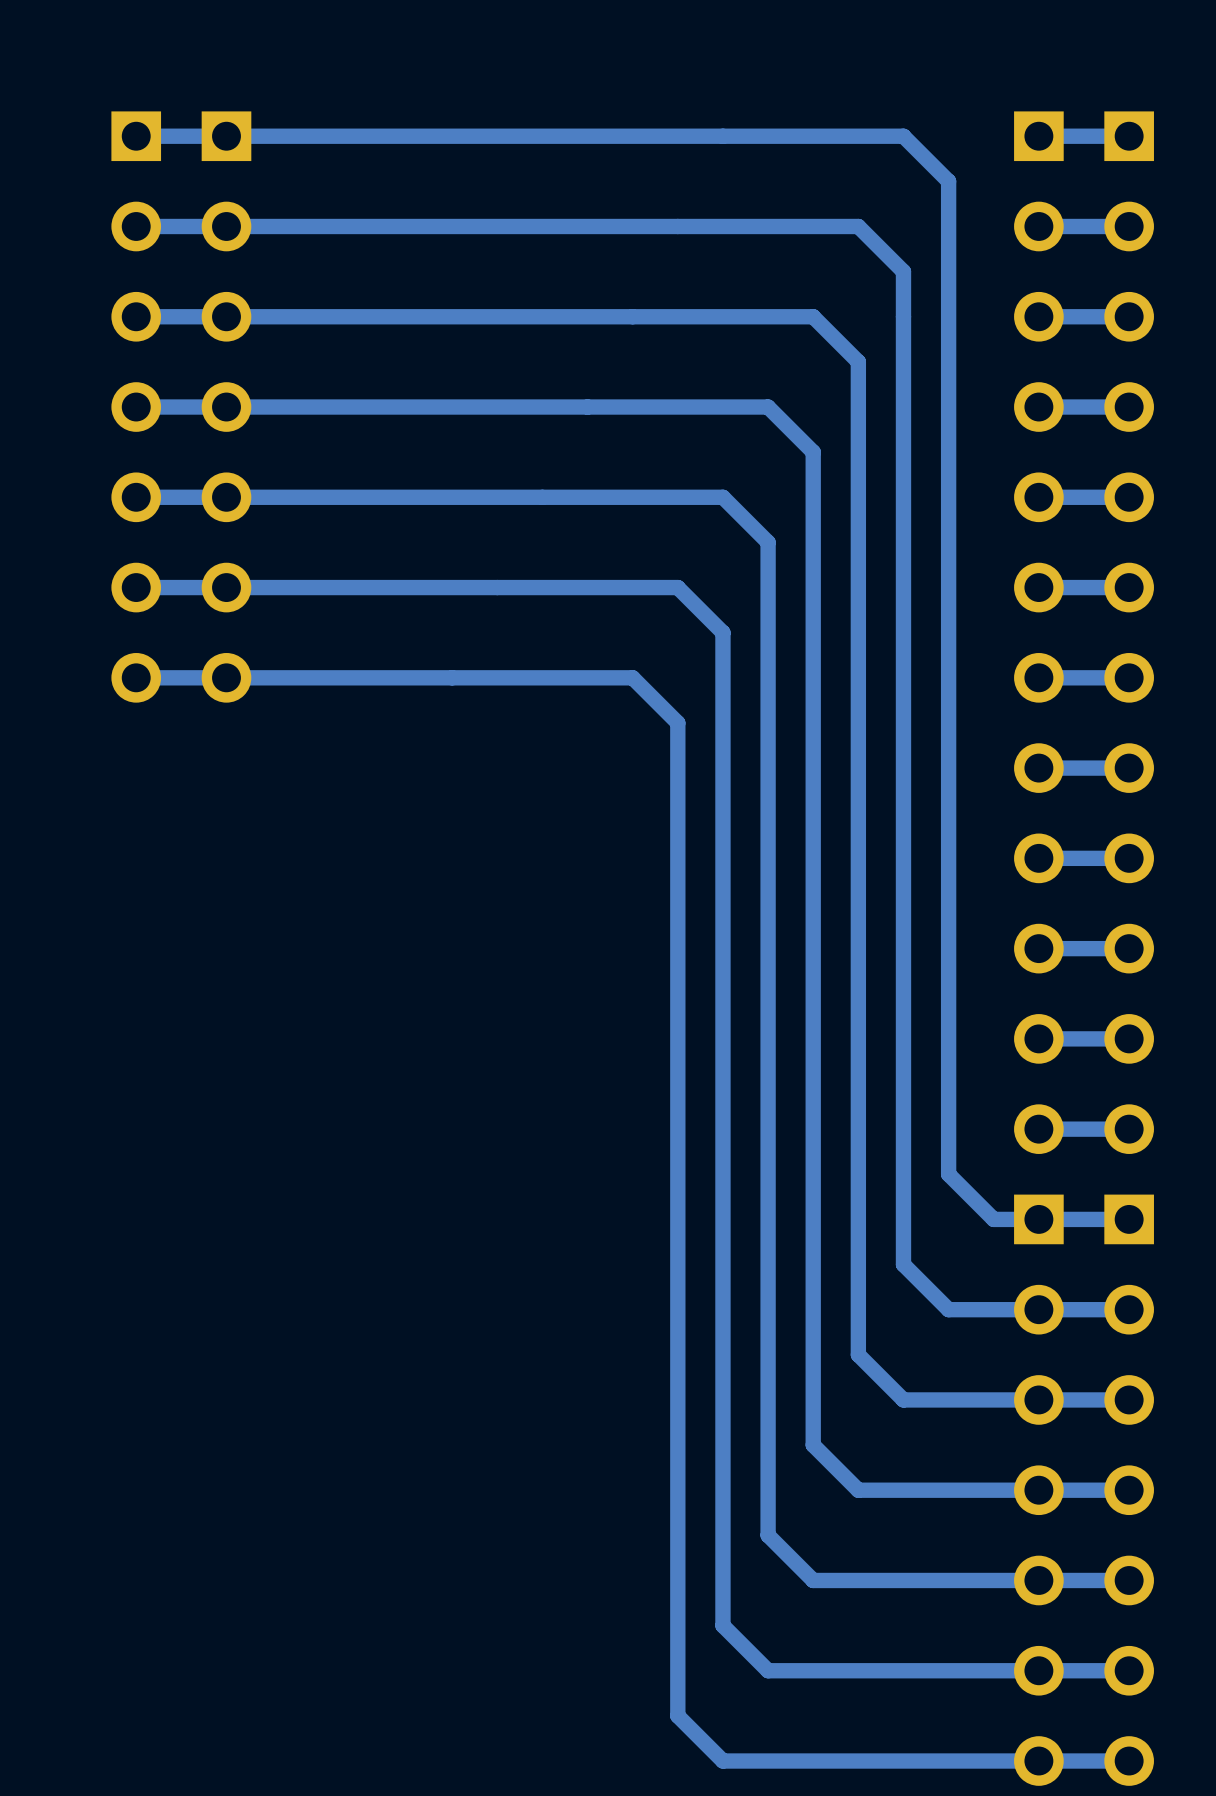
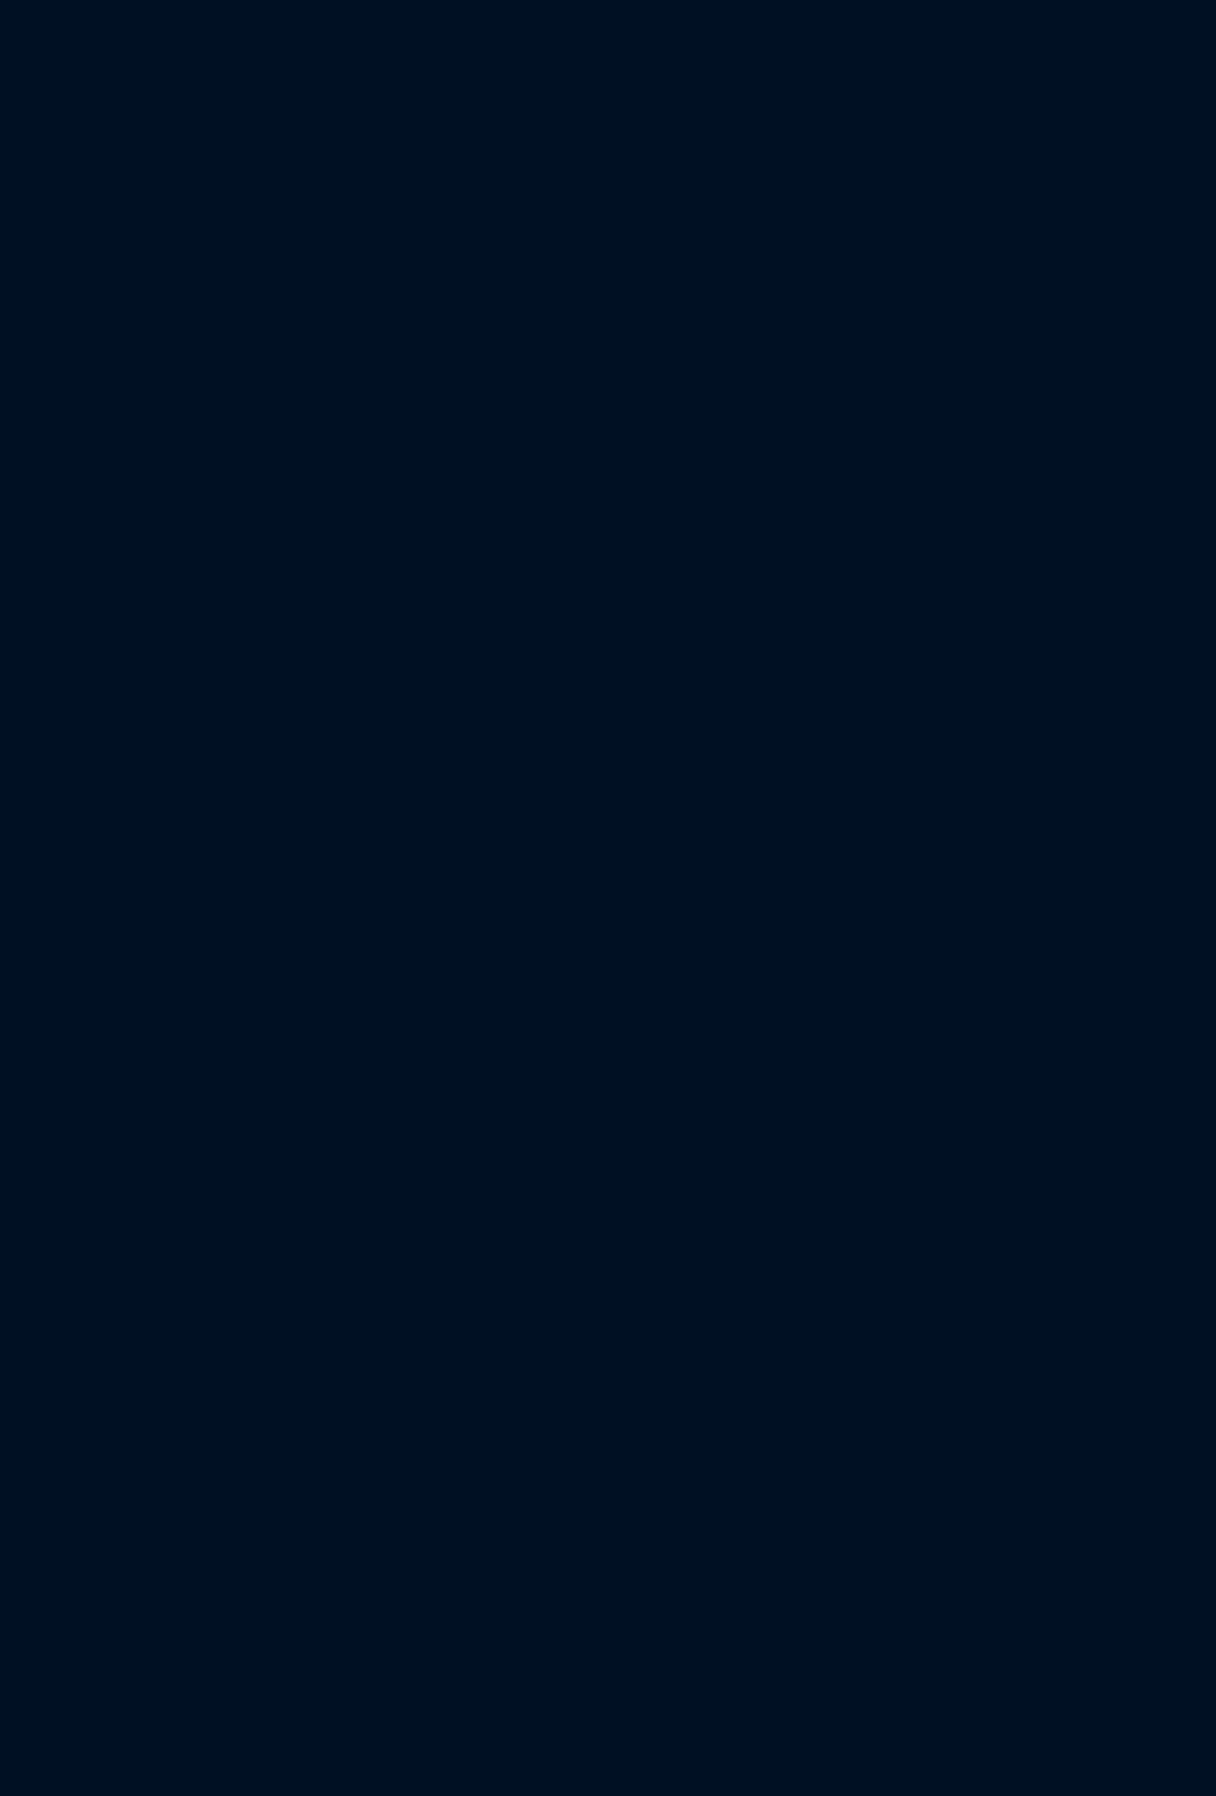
bottom track: (136, 136) (903, 136) (948, 181) (948, 1174) (993, 1219) (1129, 1219) -> none
bottom track: (1129, 136) (1038, 136) -> none
bottom track: (136, 226) (858, 226) (903, 271) (903, 1264) (948, 1309) (1129, 1309) -> none
bottom track: (1129, 226) (1038, 226) -> none
bottom track: (136, 316) (813, 316) (858, 361) (858, 1354) (903, 1399) (1129, 1399) -> none
bottom track: (1129, 316) (1038, 316) -> none
bottom track: (136, 407) (768, 407) (813, 452) (813, 1445) (858, 1490) (1129, 1490) -> none
part: (136, 407) -> none
part: (226, 407) -> none
bottom track: (1129, 407) (1038, 407) -> none
bottom track: (136, 497) (722, 497) (768, 542) (768, 1535) (813, 1580) (1129, 1580) -> none
bottom track: (1129, 497) (1038, 497) -> none
bottom track: (136, 587) (677, 587) (722, 632) (722, 1625) (768, 1670) (1129, 1670) -> none
bottom track: (1129, 587) (1038, 587) -> none
part: (1038, 632) -> none
part: (1129, 632) -> none
bottom track: (136, 677) (632, 677) (677, 722) (677, 1715) (722, 1761) (1129, 1761) -> none
bottom track: (1129, 677) (1038, 677) -> none
bottom track: (1129, 768) (1038, 768) -> none
bottom track: (1129, 858) (1038, 858) -> none
bottom track: (1129, 948) (1038, 948) -> none
bottom track: (1129, 1038) (1038, 1038) -> none
bottom track: (1129, 1129) (1038, 1129) -> none
part: (1038, 1490) -> none
part: (1129, 1490) -> none

